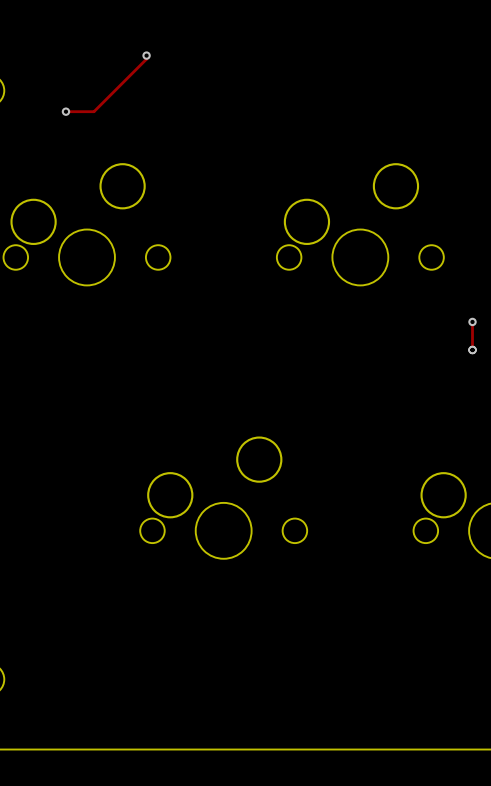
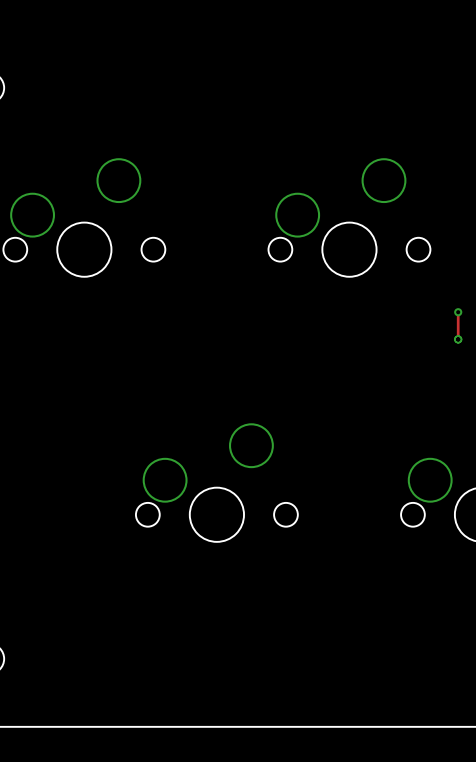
track: (146, 55) (146, 59) (94, 111) (65, 111) -> none
via: (146, 55) -> none
via: (65, 111) -> none

